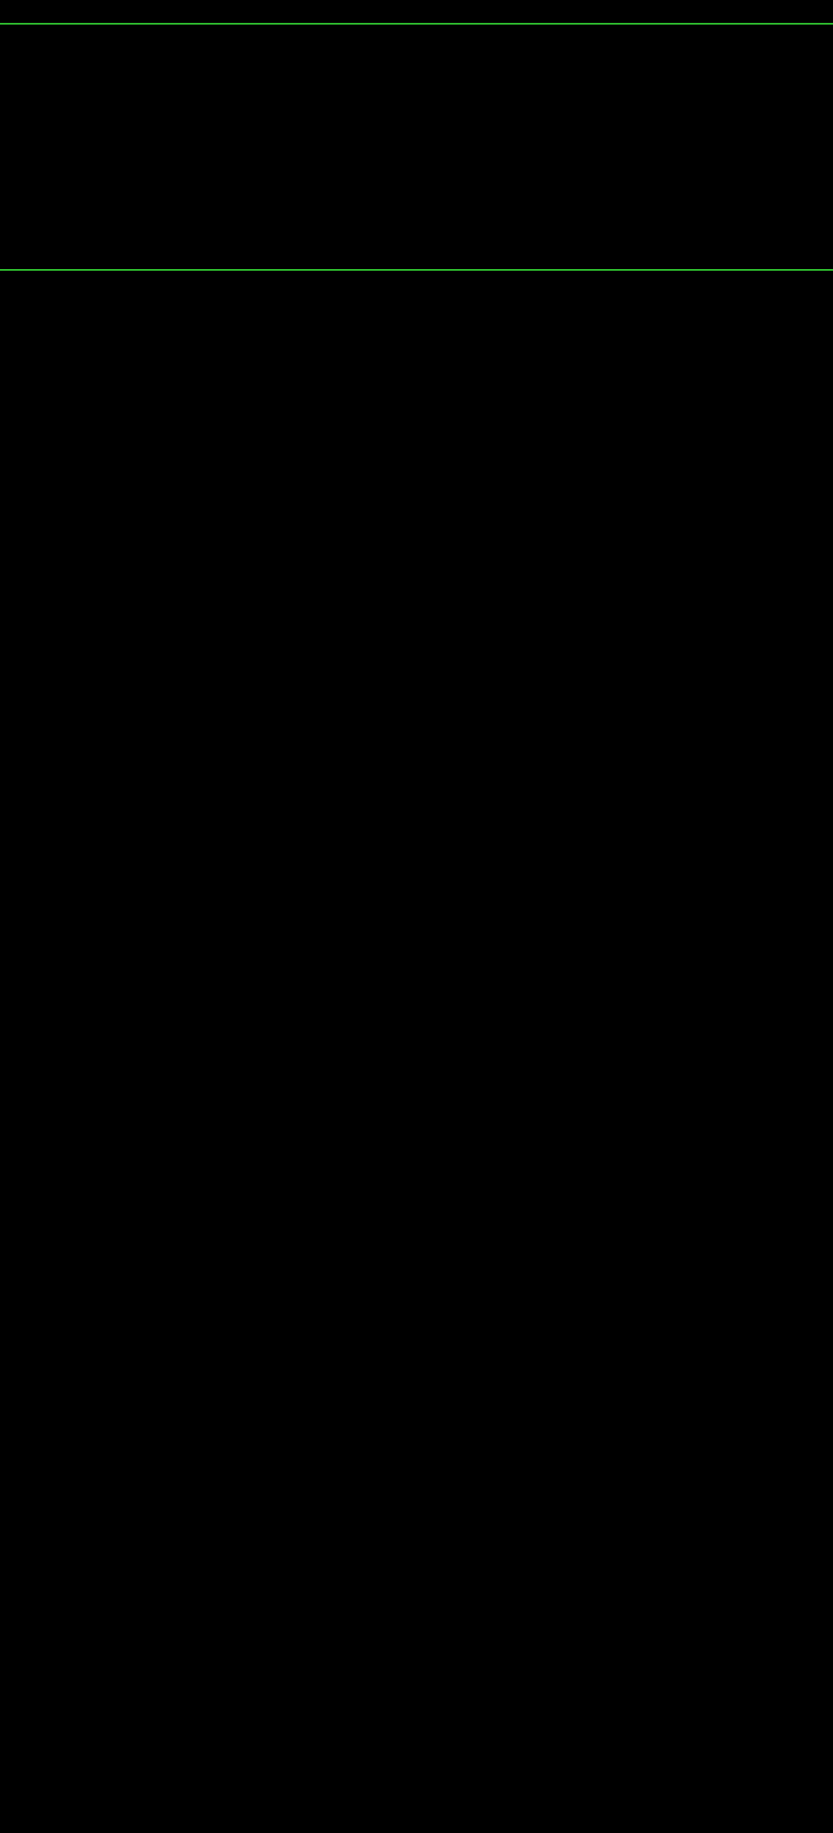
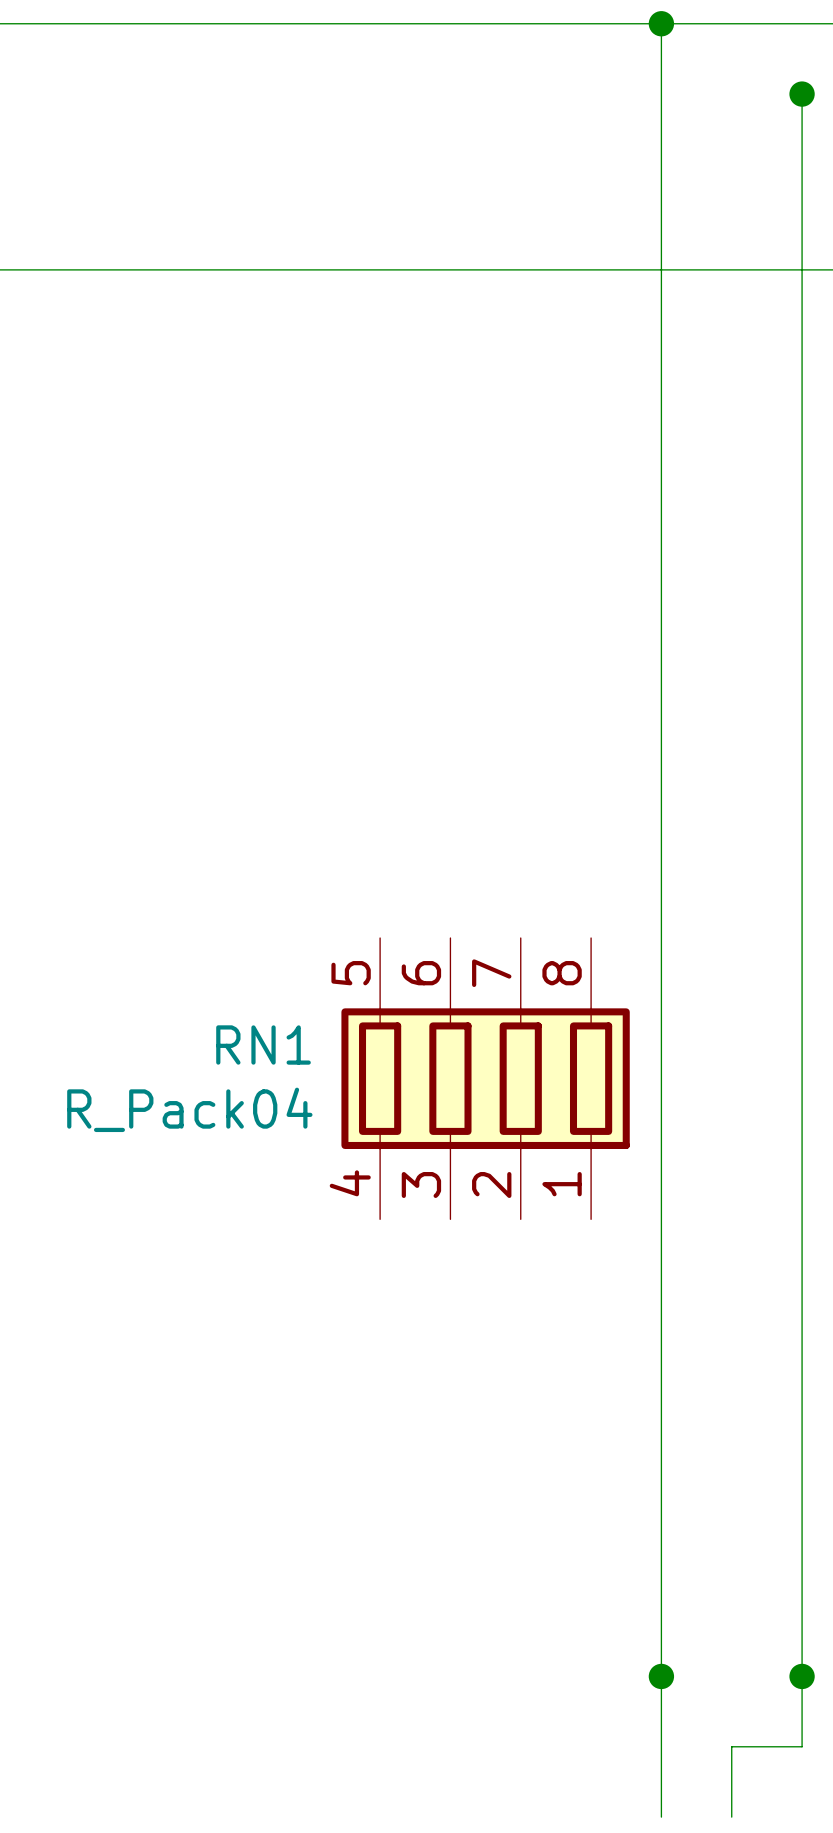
wire: none -> (661, 23) (661, 1817)
junction: none -> (661, 23)
wire: none -> (802, 94) (802, 1746) (731, 1746) (731, 1817)
junction: none -> (802, 94)
RN1: none -> R_Pack04 (485, 1078)
junction: none -> (661, 1676)
junction: none -> (802, 1676)

